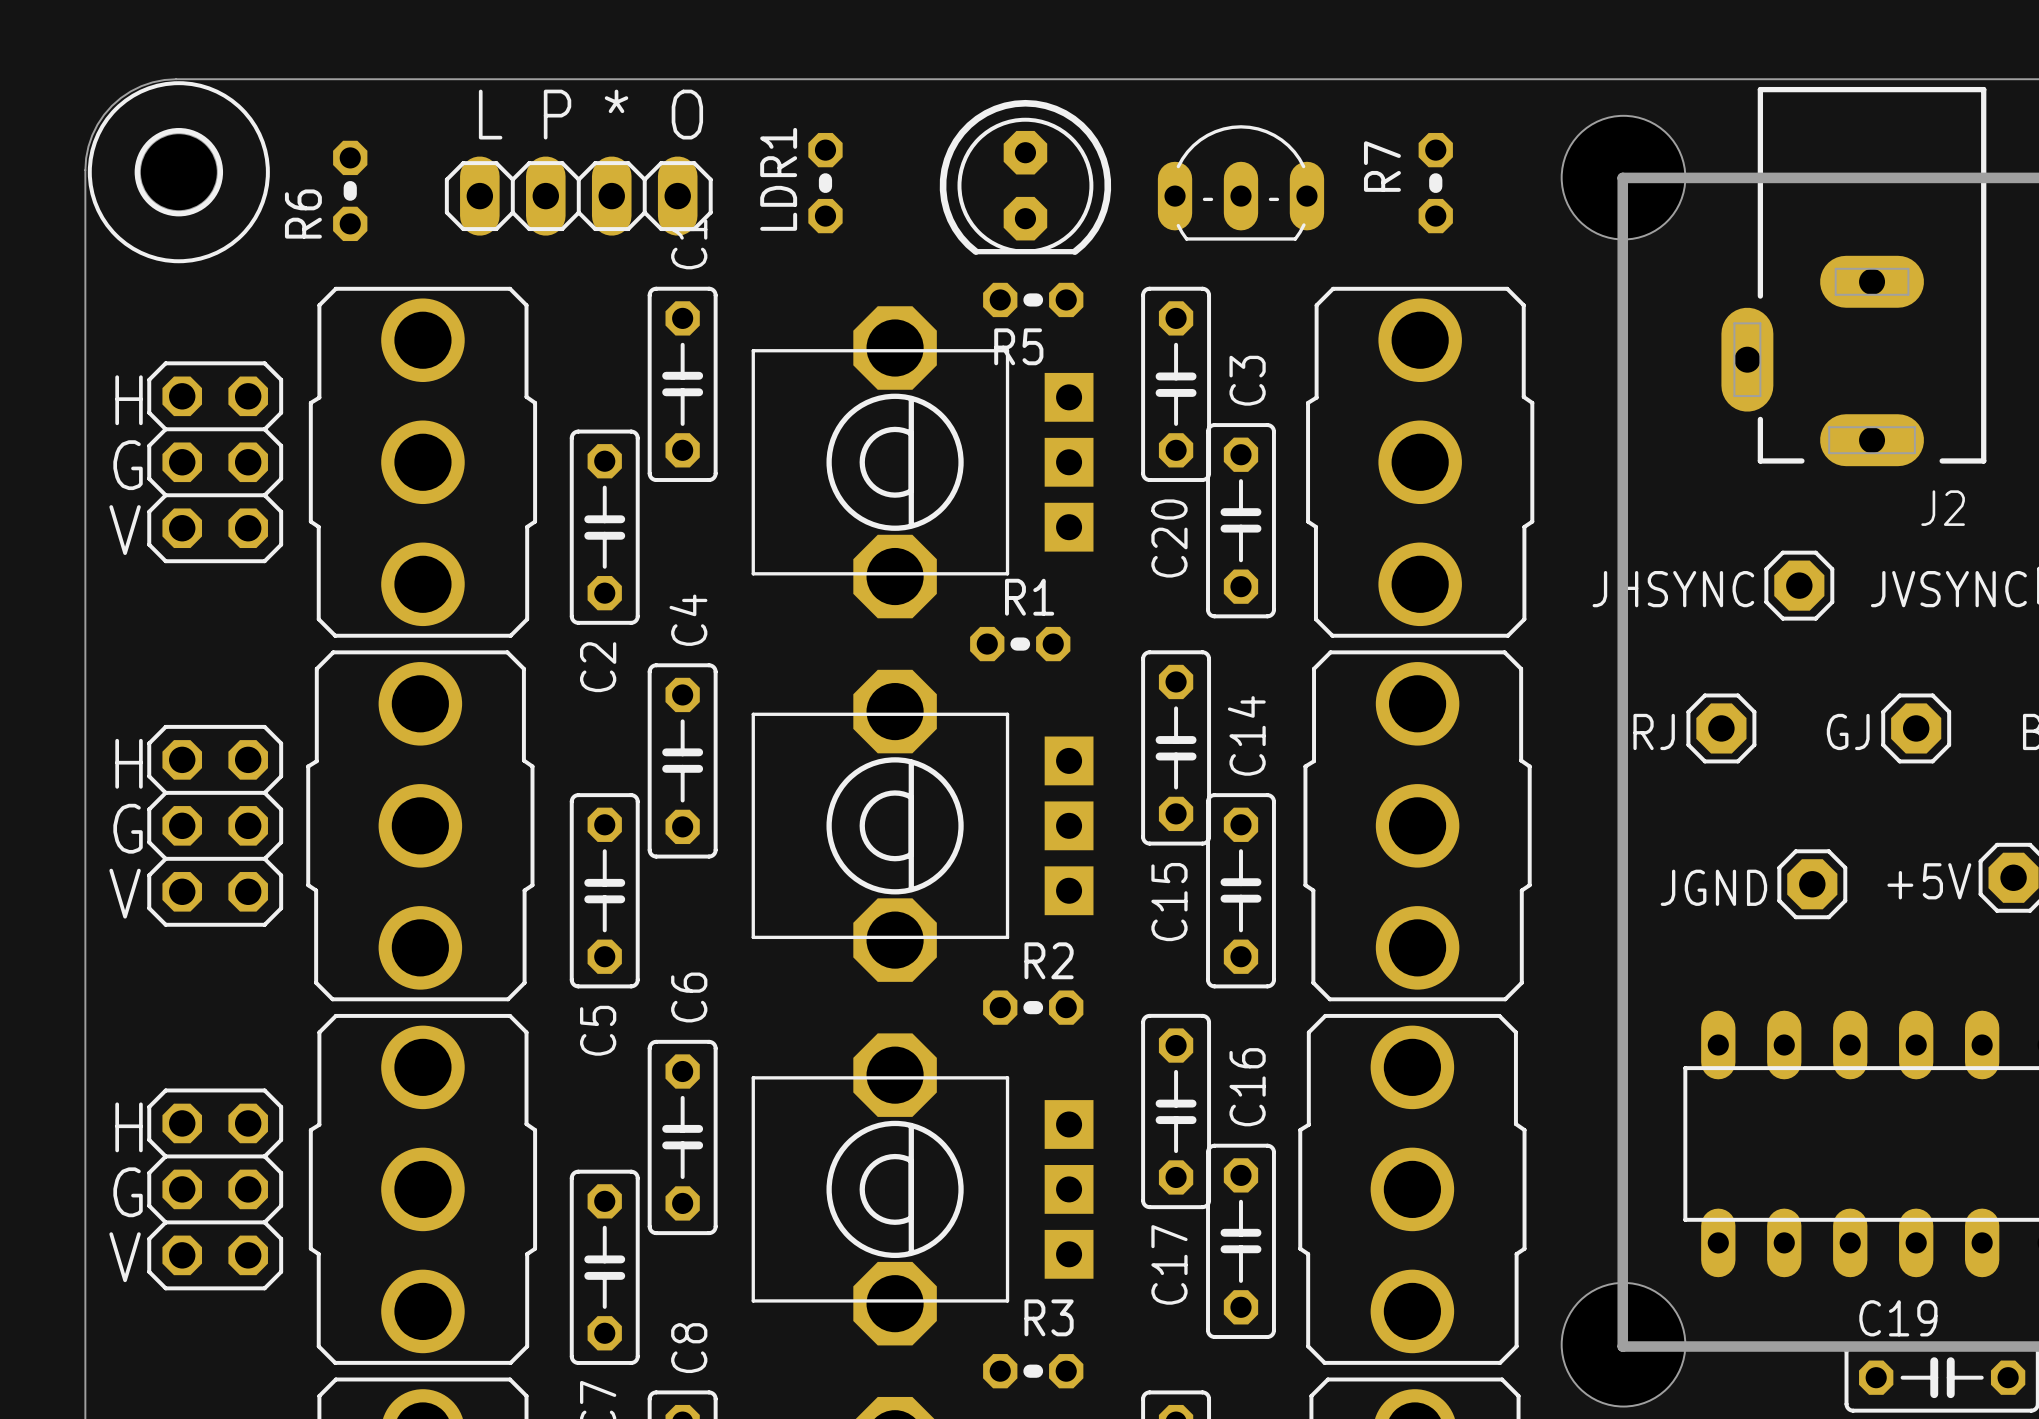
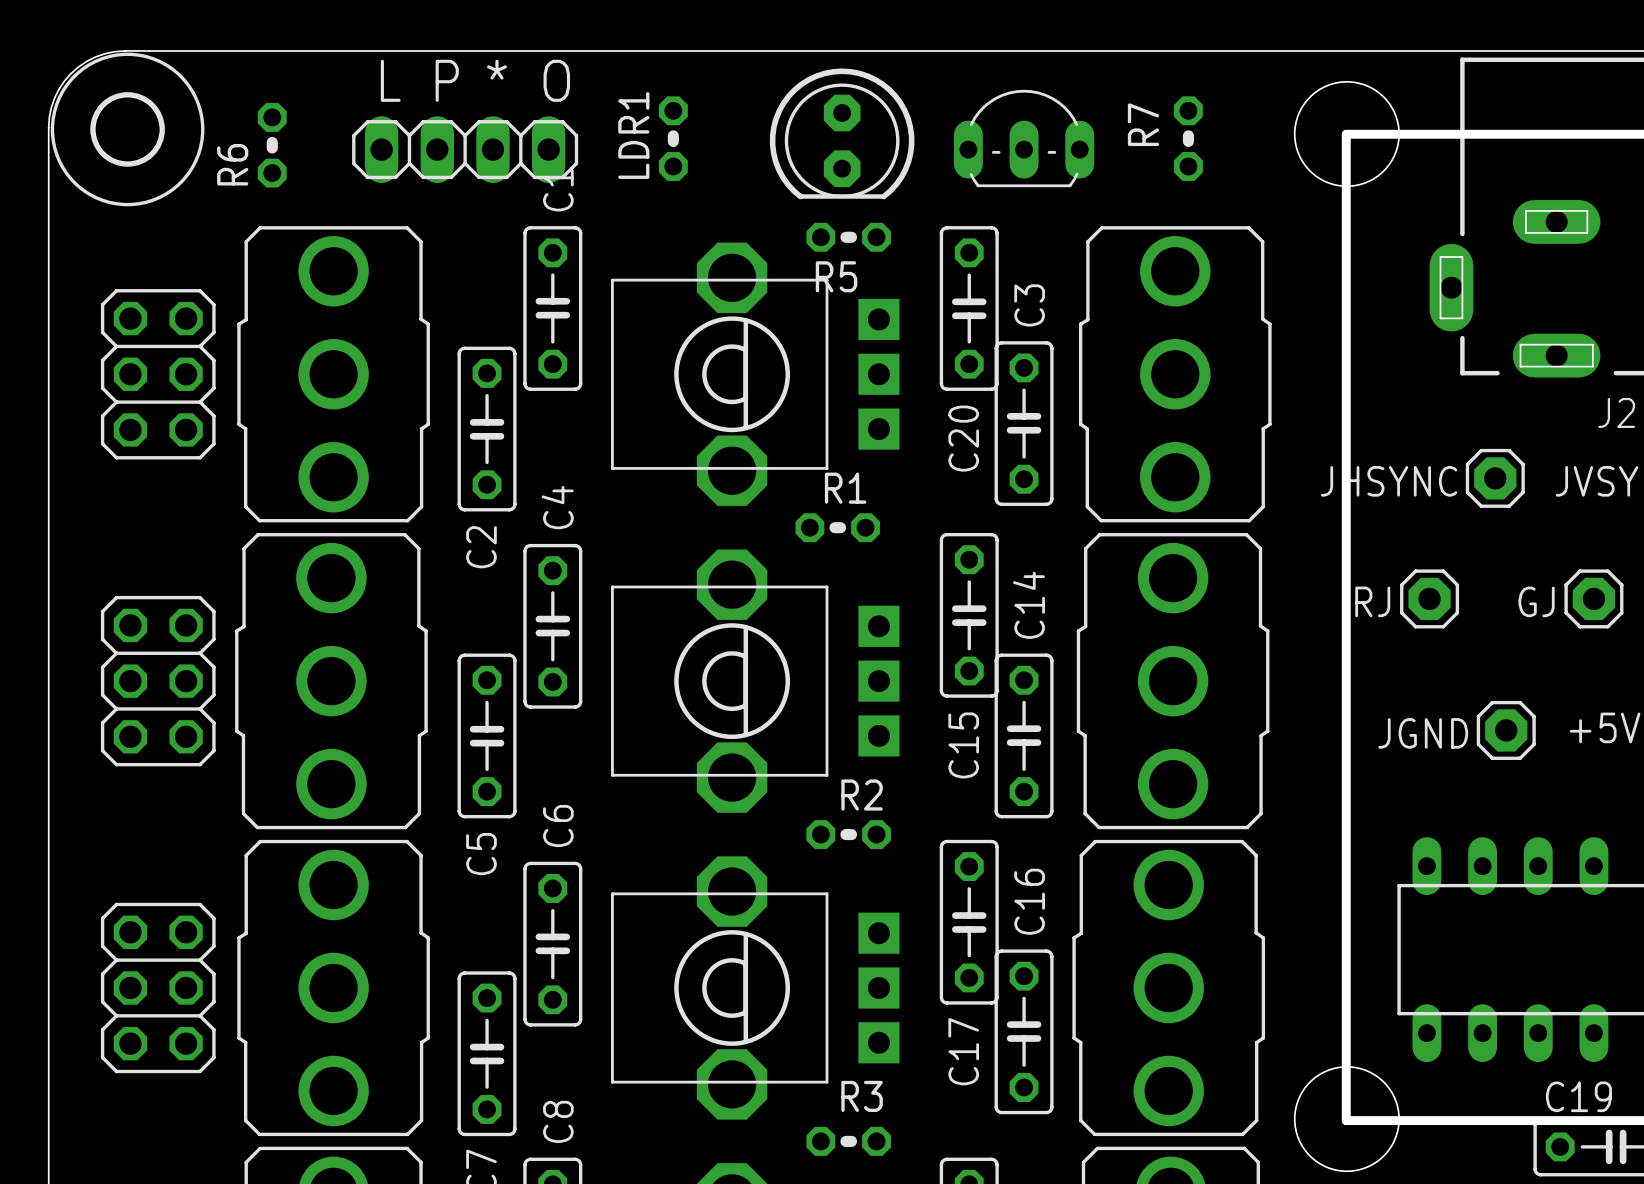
text: H (129, 400) -> none
text: G (128, 465) -> none
text: V (125, 530) -> none
text: H (129, 763) -> none
text: G (128, 828) -> none
text: V (125, 893) -> none
text: H (129, 1127) -> none
text: G (128, 1192) -> none
text: V (125, 1257) -> none

